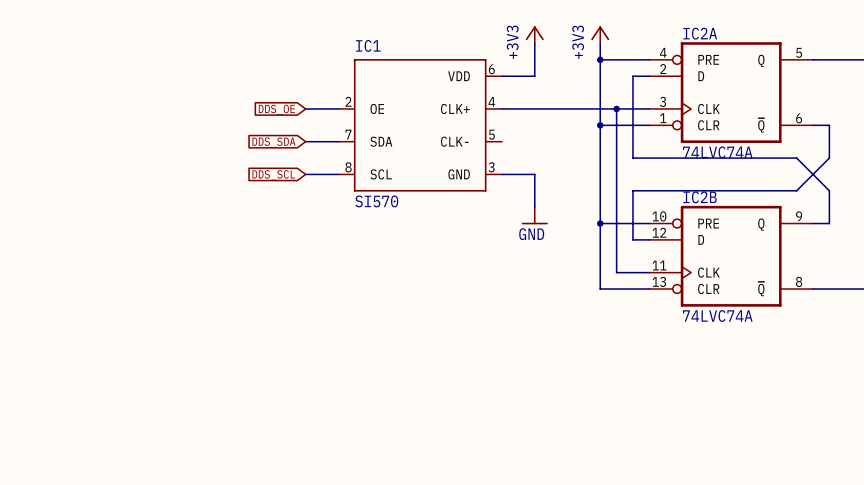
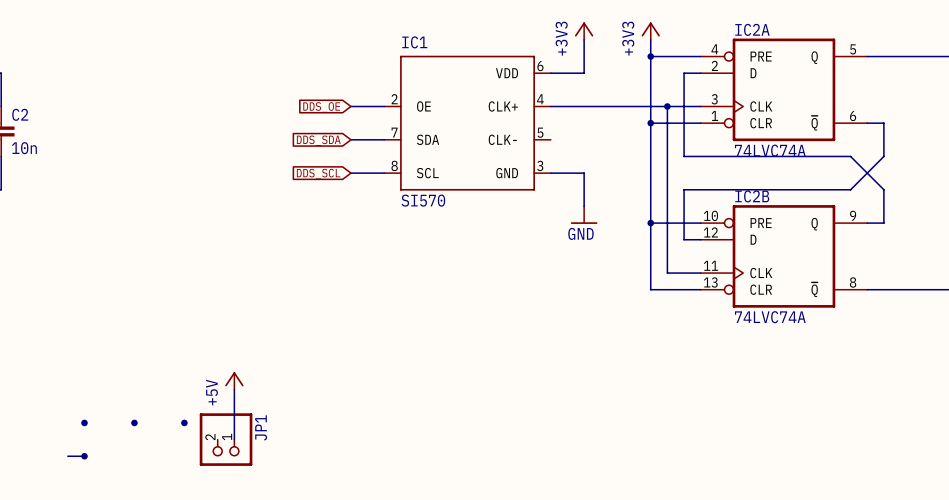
power symbol: none -> +5V (234, 380)
wire: none -> (234, 389) (234, 439)
junction: none -> (84, 422)
junction: none -> (134, 422)
junction: none -> (184, 422)
JP1: none -> (226, 439)
wire: none -> (67, 456) (84, 456)
junction: none -> (84, 456)

